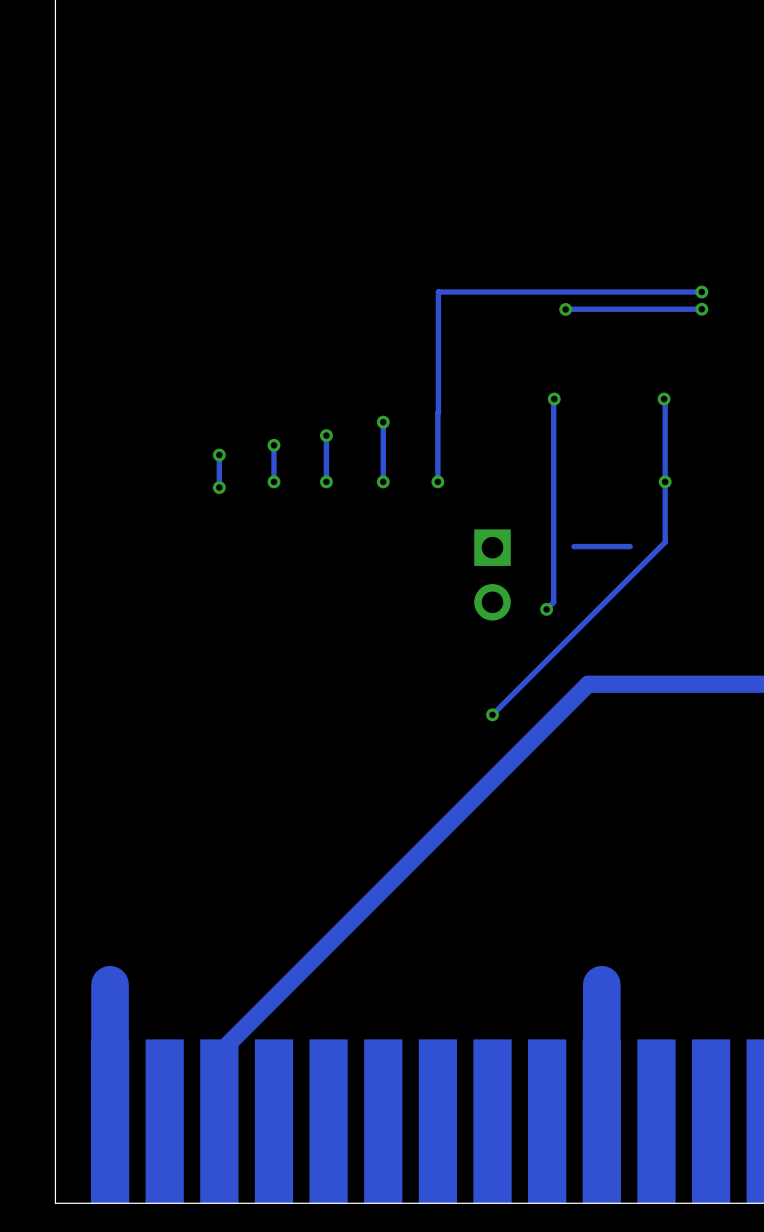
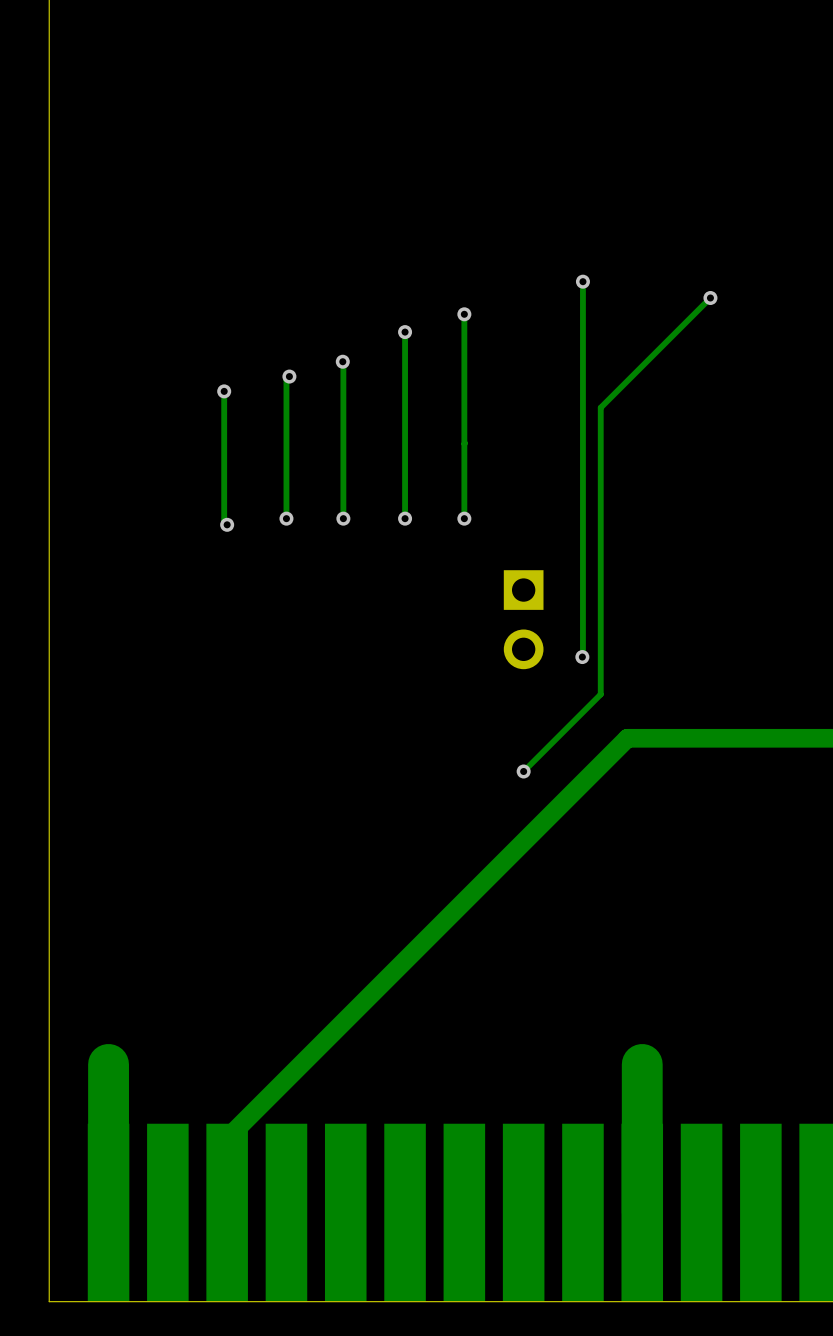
via: none -> (710, 297)
track: (701, 292) (438, 292) (438, 412) -> (464, 314) (464, 443)
via: (701, 292) -> none
via: none -> (464, 314)
track: none -> (405, 332) (405, 453)
via: none -> (405, 332)
via position: (565, 309) -> (582, 281)
track: (701, 309) (565, 309) -> none
via: (701, 309) -> none
track: none -> (342, 361) (343, 468)
via: none -> (342, 361)
track: none -> (289, 376) (286, 379) (286, 478)
via: none -> (289, 376)
via: none -> (224, 391)
track: (554, 399) (553, 602) (547, 608) -> (582, 281) (582, 656)
via: (554, 399) -> none
track: (664, 399) (665, 542) (563, 643) -> (710, 297) (600, 407) (600, 694)
via: (664, 399) -> none
via: (383, 422) -> none
via: (326, 435) -> none
via: (273, 445) -> none
track: (219, 454) (219, 487) -> (224, 391) (224, 521) (227, 524)
via: (219, 454) -> none
via: (665, 481) -> none
track: (630, 546) (573, 546) -> none

